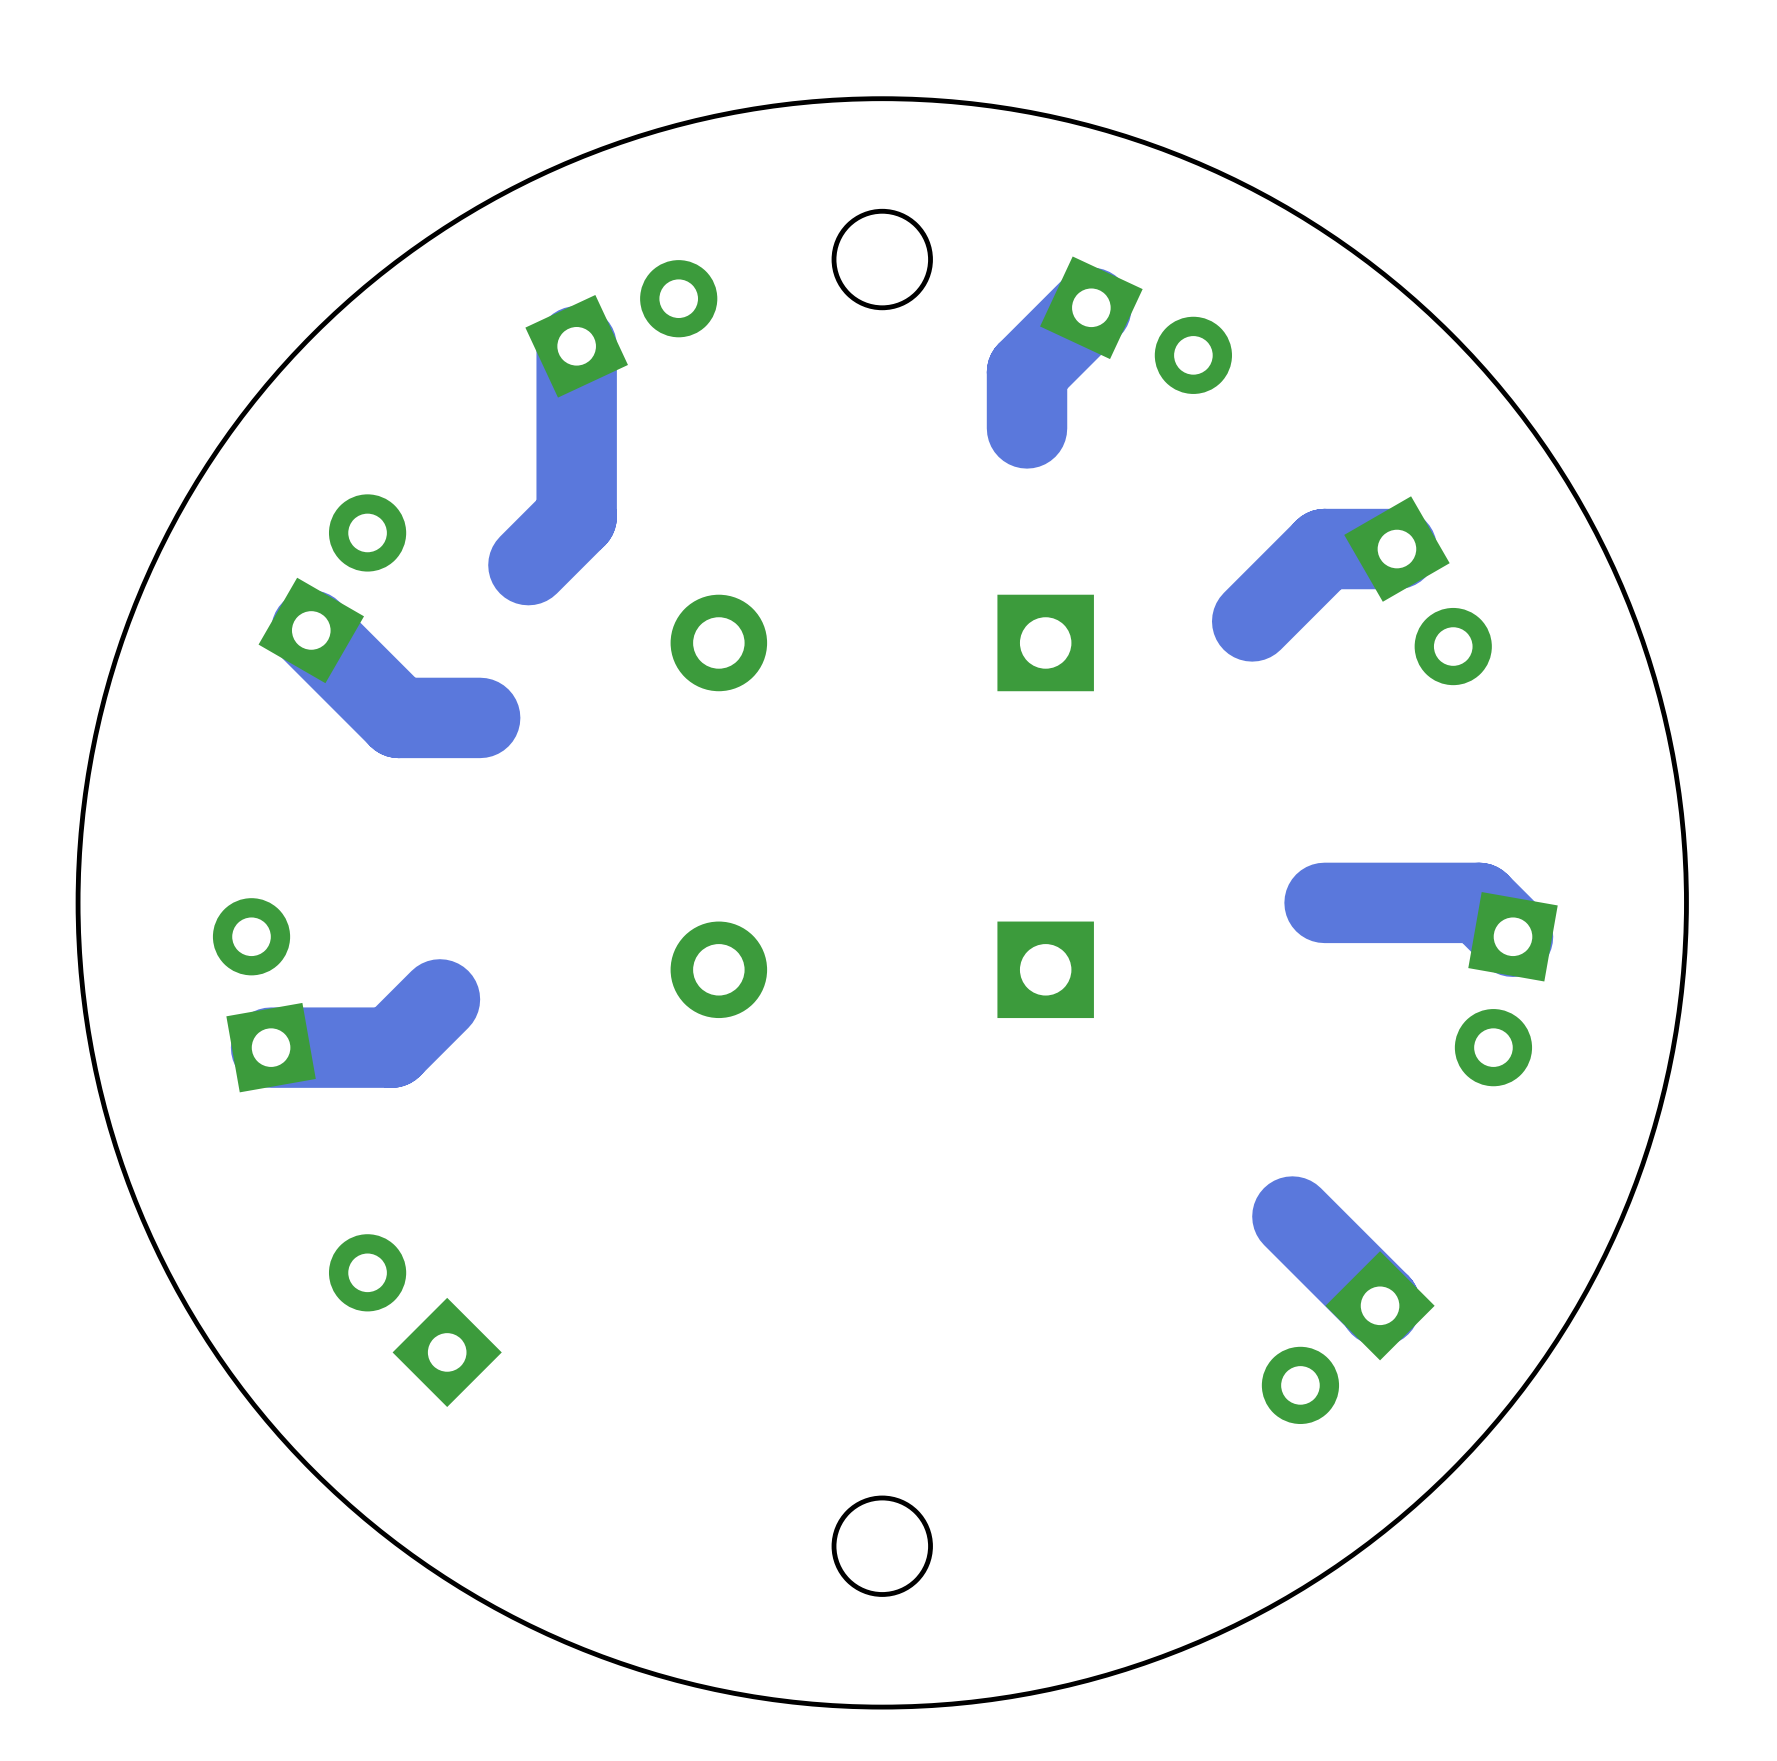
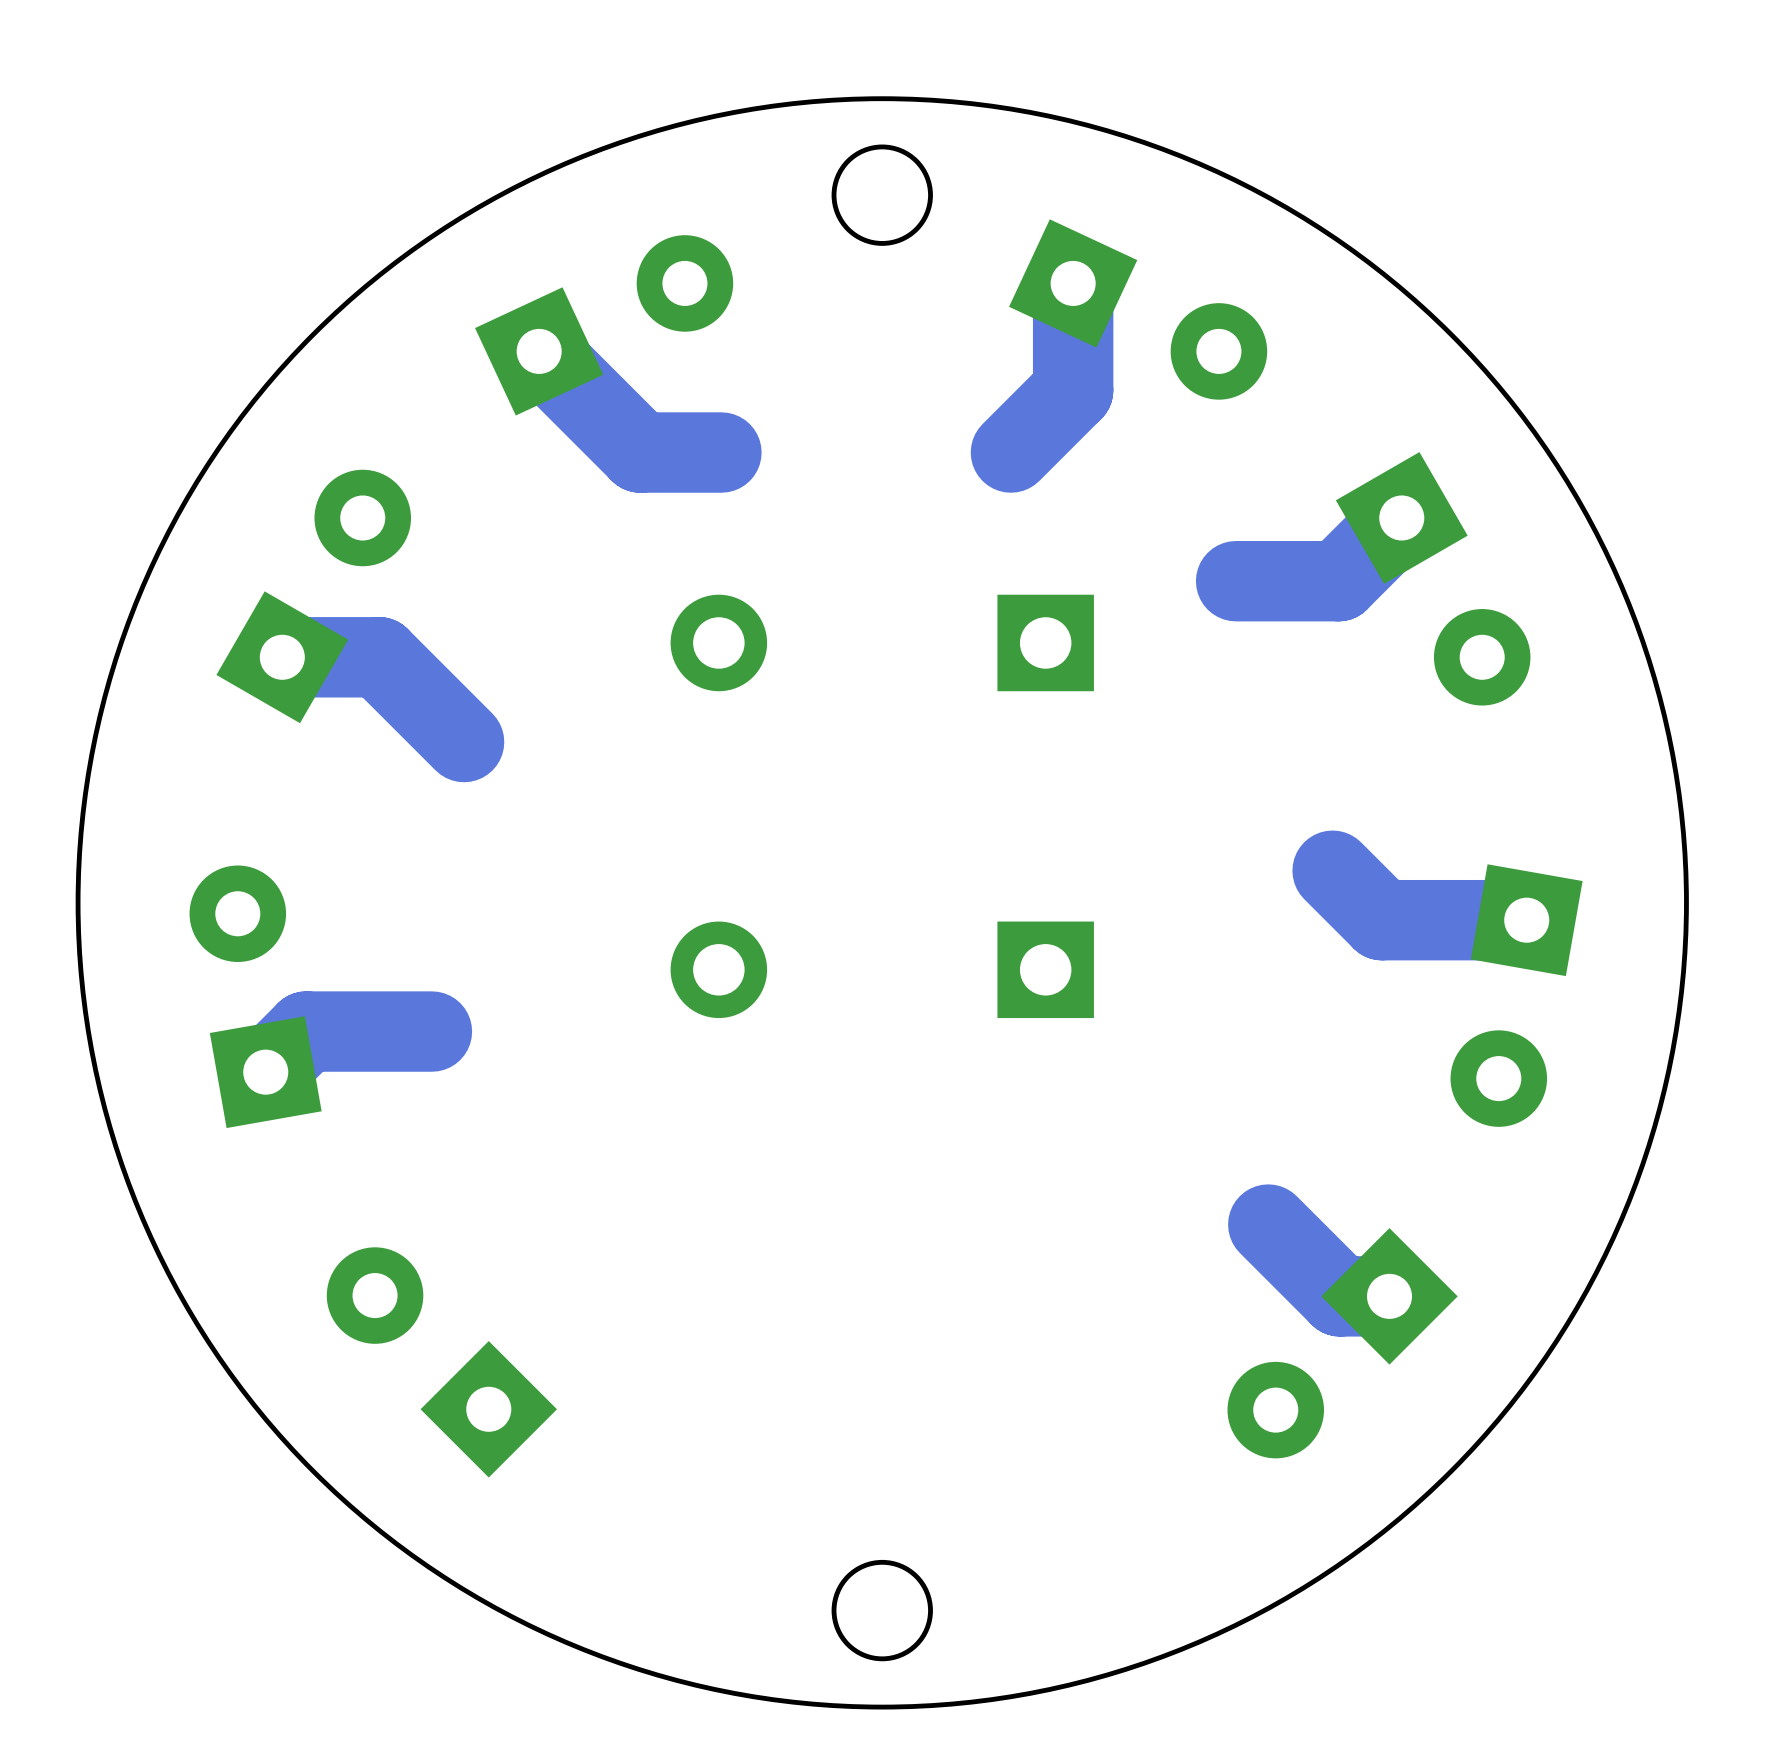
part footprint: [1040, 256, 1233, 394] -> [1009, 219, 1268, 400]
round board edge position: (882, 259) -> (882, 195)
part footprint: [525, 260, 718, 398] -> [475, 235, 734, 416]
track: none -> (1073, 283) (1073, 390) (1010, 452)
track: (1091, 307) (1027, 372) (1027, 428) -> none
track: (576, 346) (576, 516) (528, 565) -> none
track: none -> (539, 351) (640, 452) (721, 452)
part footprint: [258, 494, 407, 684] -> [216, 469, 412, 724]
part footprint: [1344, 496, 1492, 686] -> [1335, 452, 1531, 706]
track: none -> (1401, 517) (1338, 581) (1236, 581)
track: (1396, 549) (1324, 549) (1252, 621) -> none
track: (311, 630) (398, 717) (480, 717) -> none
track: none -> (282, 657) (379, 657) (464, 742)
track: none -> (1332, 870) (1382, 920) (1526, 920)
part footprint: [1454, 892, 1558, 1087] -> [1450, 864, 1583, 1127]
part footprint: [212, 898, 316, 1093] -> [189, 865, 322, 1129]
track: (1324, 902) (1479, 902) (1513, 936) -> none
track: (439, 999) (391, 1047) (271, 1047) -> none
track: none -> (431, 1031) (306, 1031) (265, 1072)
track: (1292, 1216) (1380, 1305) -> none
track: none -> (1268, 1224) (1340, 1296) (1389, 1296)
part footprint: [1261, 1251, 1435, 1425] -> [1227, 1228, 1458, 1459]
part: (415, 1320) -> none
part: none -> (441, 1362)
round board edge position: (882, 1546) -> (882, 1610)

